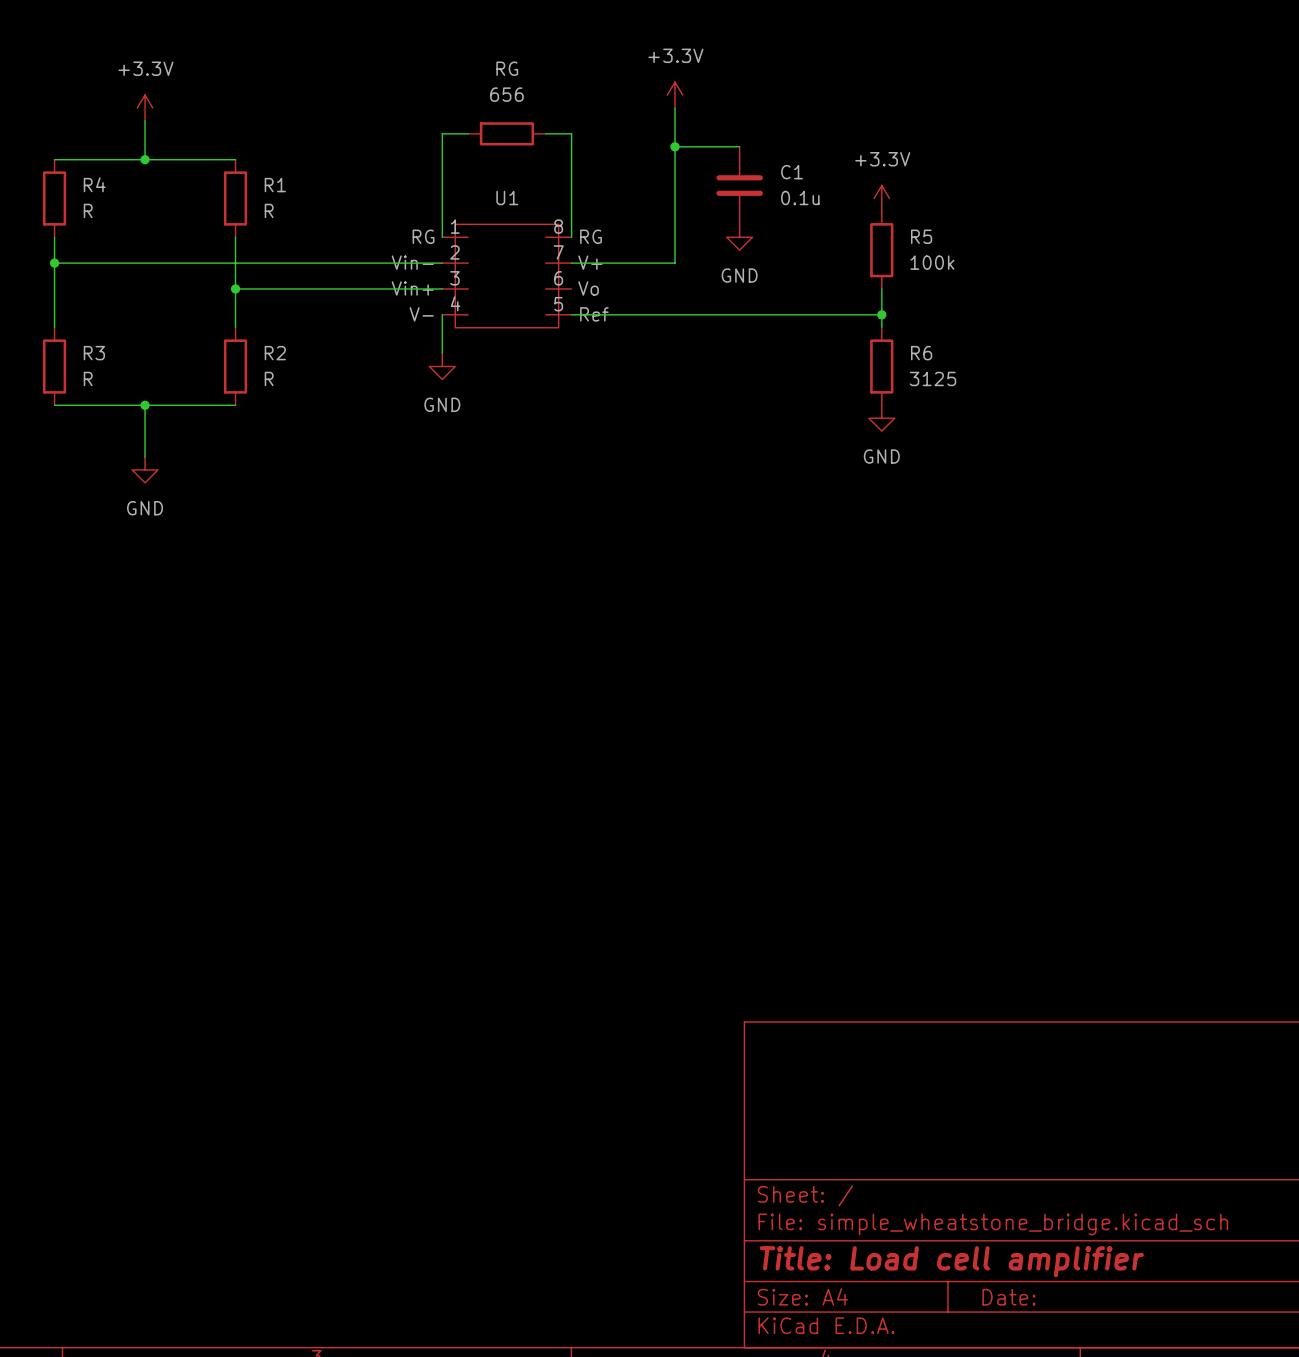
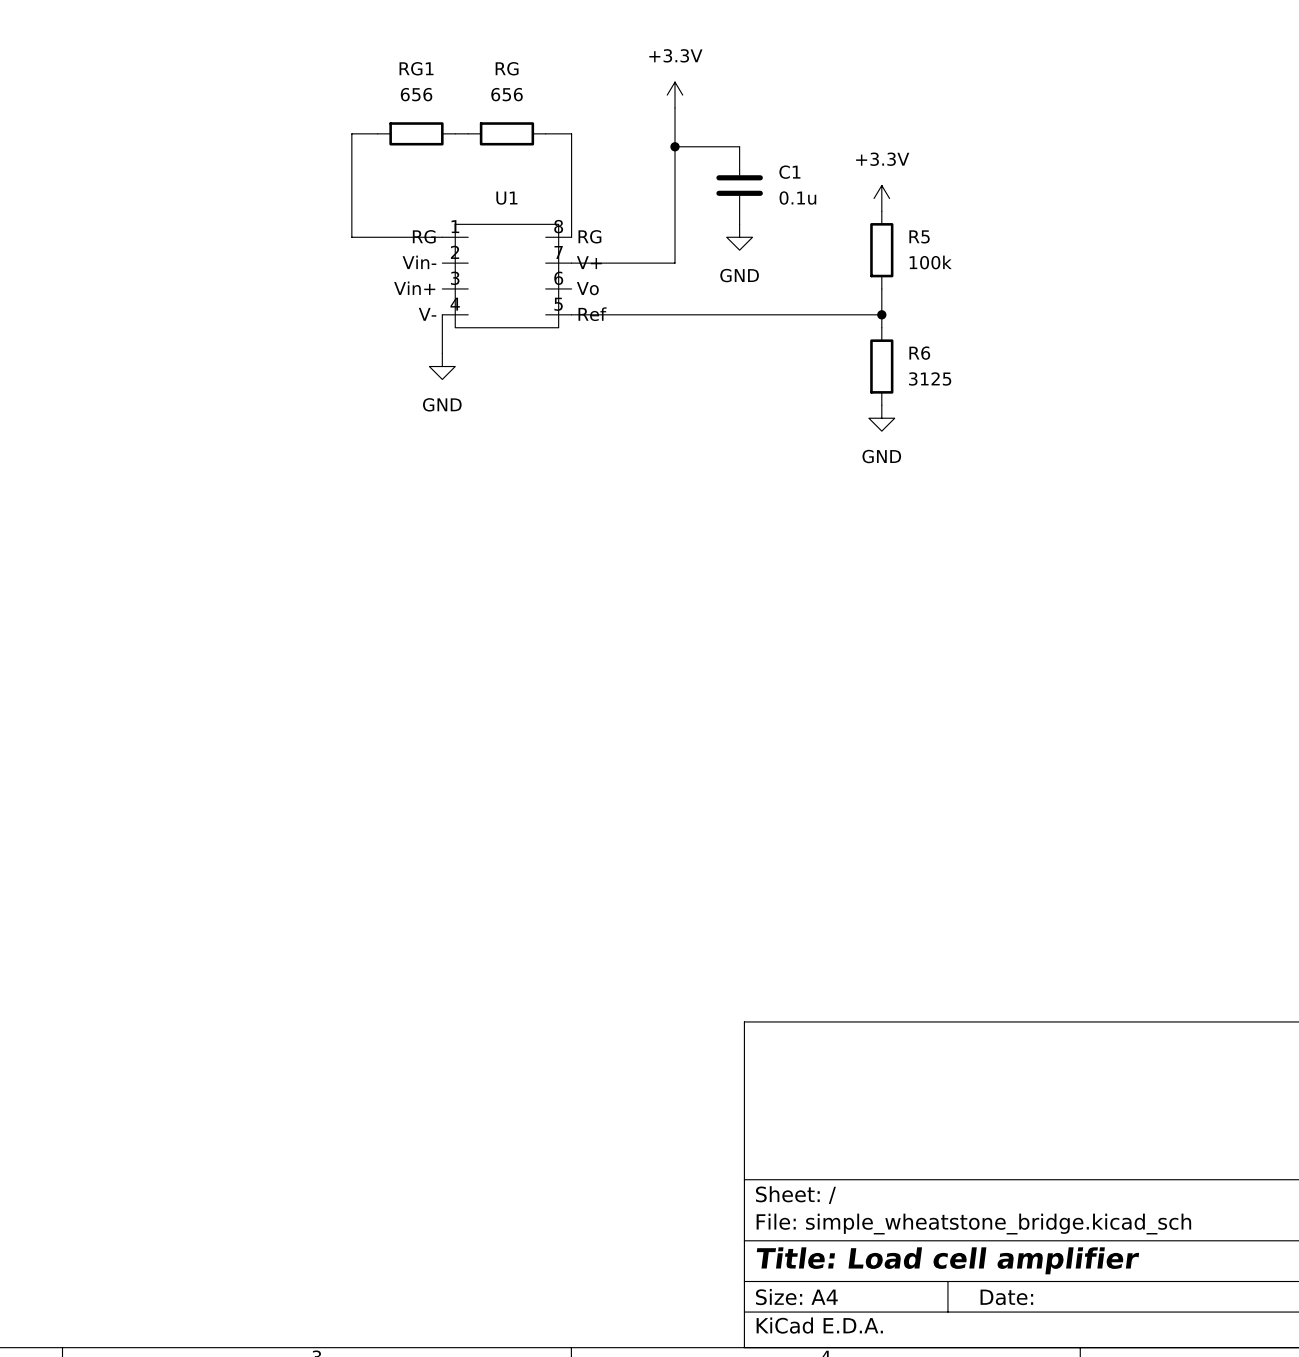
power symbol: +3.3V (145, 108) -> none
wire: (145, 120) (145, 159) -> none
RG1: none -> 656 (416, 133)
wire: (455, 133) (442, 133) (442, 237) -> (377, 133) (351, 133) (351, 237) (442, 237)
wire: (54, 159) (235, 159) -> none
junction: (145, 159) -> none
R4: R (54, 198) -> none
R1: R (235, 198) -> none
wire: (54, 237) (54, 327) -> none
wire: (235, 237) (235, 327) -> none
wire: (54, 263) (442, 263) -> none
junction: (54, 263) -> none
wire: (235, 288) (442, 288) -> none
junction: (235, 288) -> none
R3: R (54, 366) -> none
R2: R (235, 366) -> none
wire: (54, 405) (235, 405) -> none
wire: (145, 405) (145, 457) -> none
junction: (145, 405) -> none
power symbol: GND (145, 469) -> none

